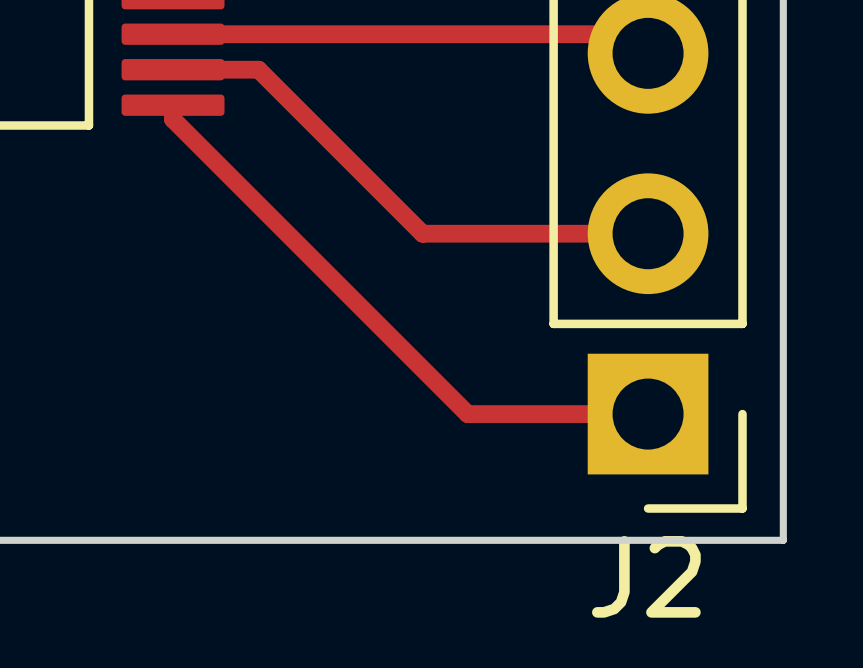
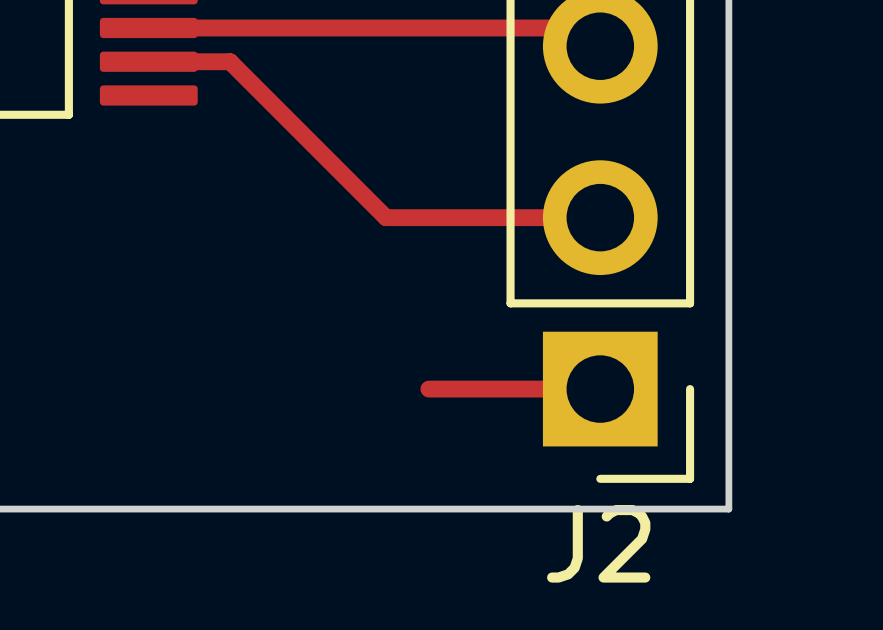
top track: (173, 105) (173, 119) (467, 414) -> none

